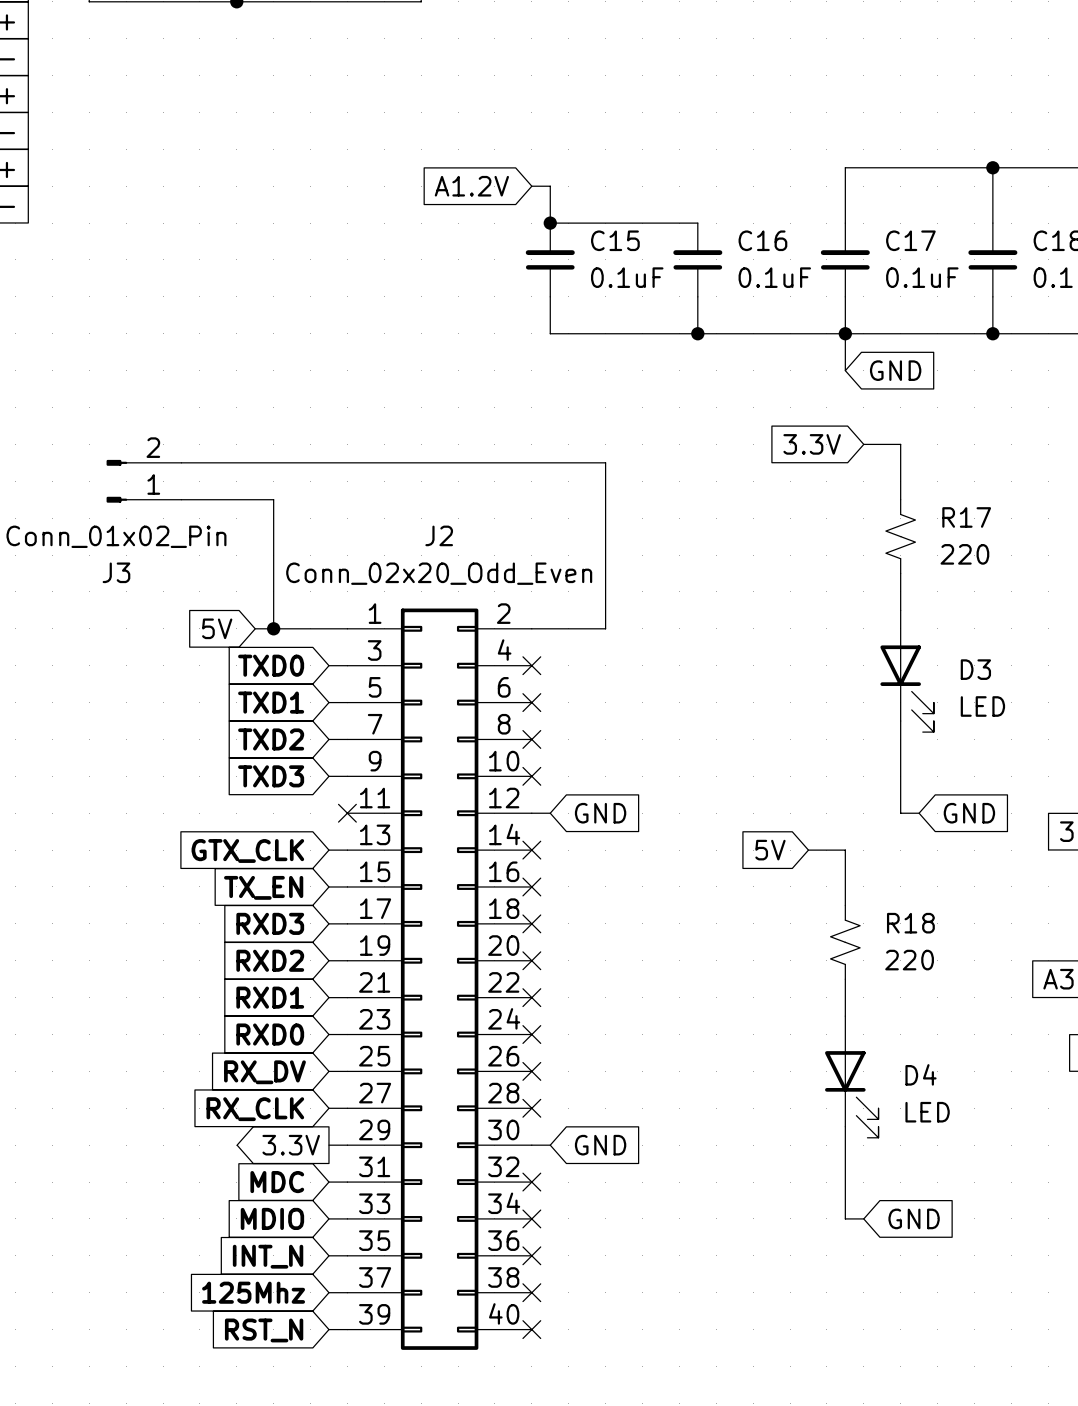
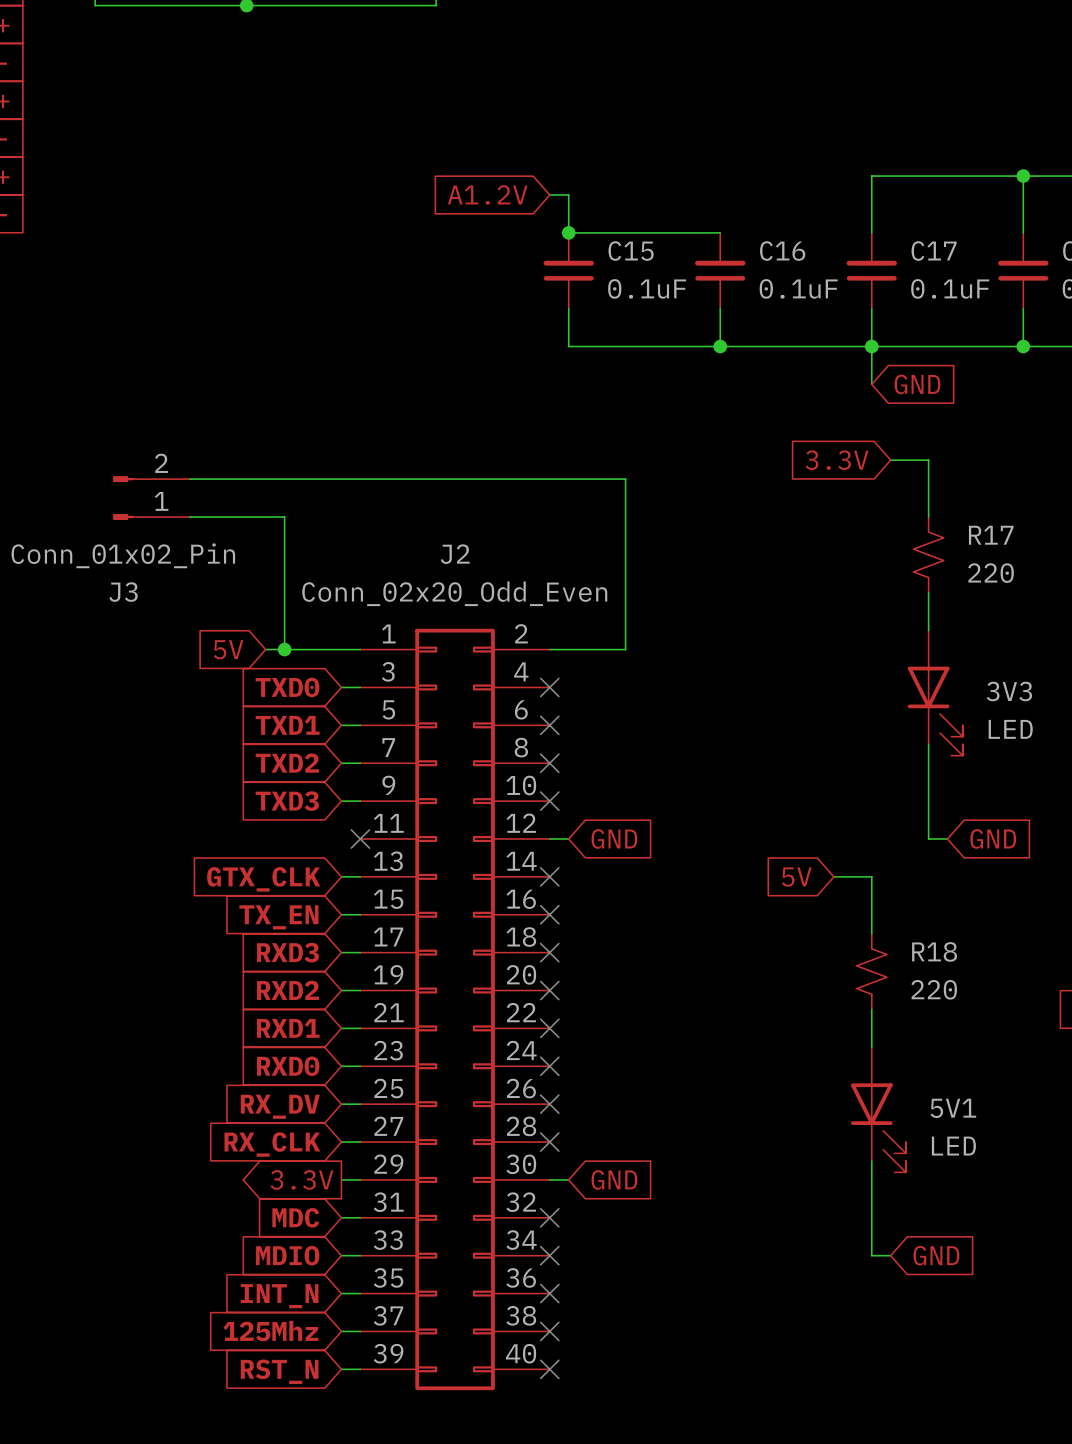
D3 name: D3 (975, 669) -> 3V3 (1009, 691)
D4 name: D4 (921, 1074) -> 5V1 (953, 1108)

